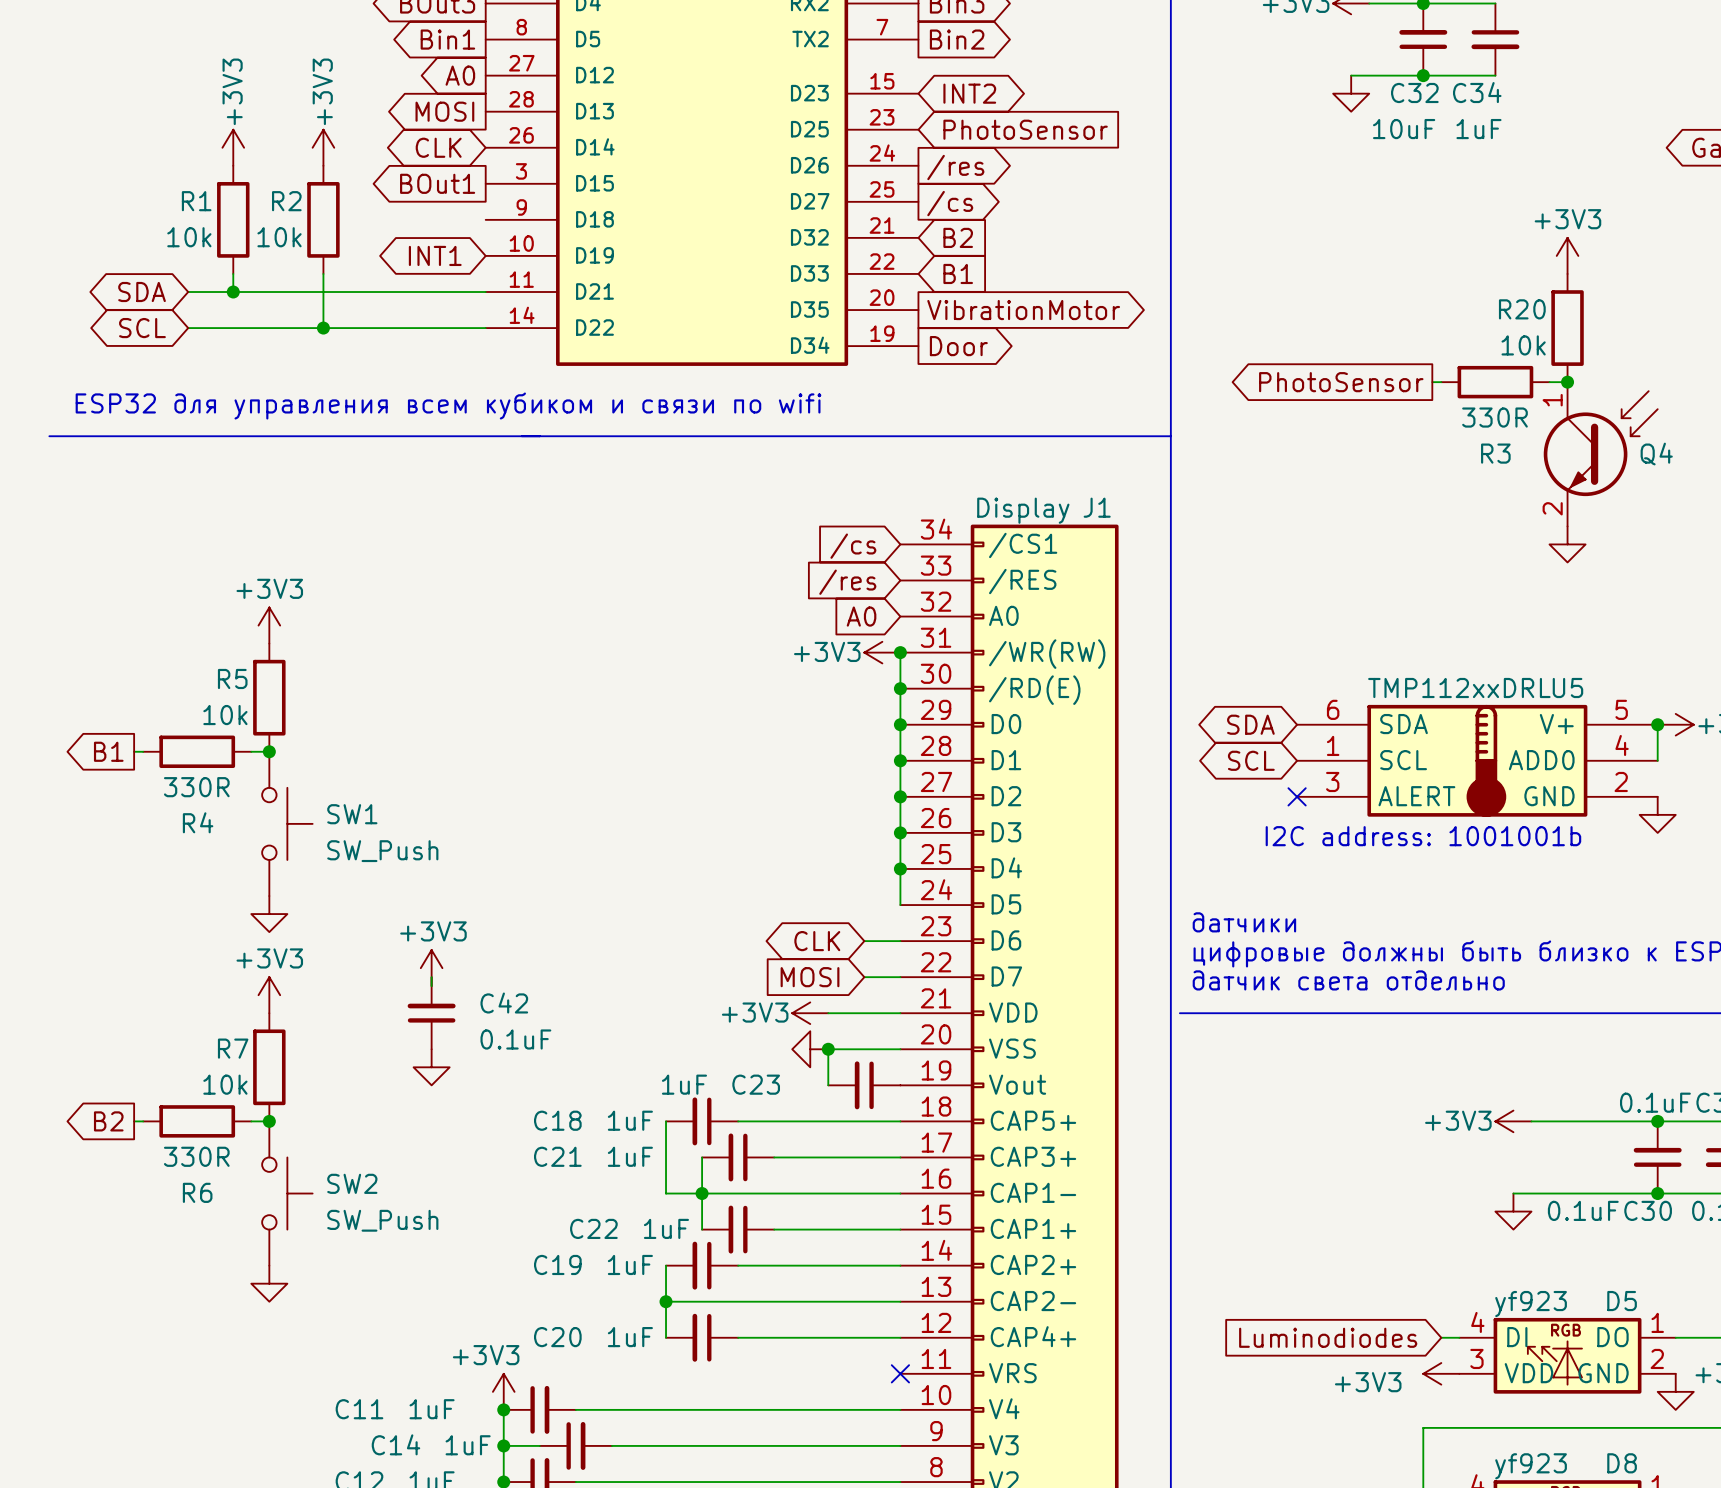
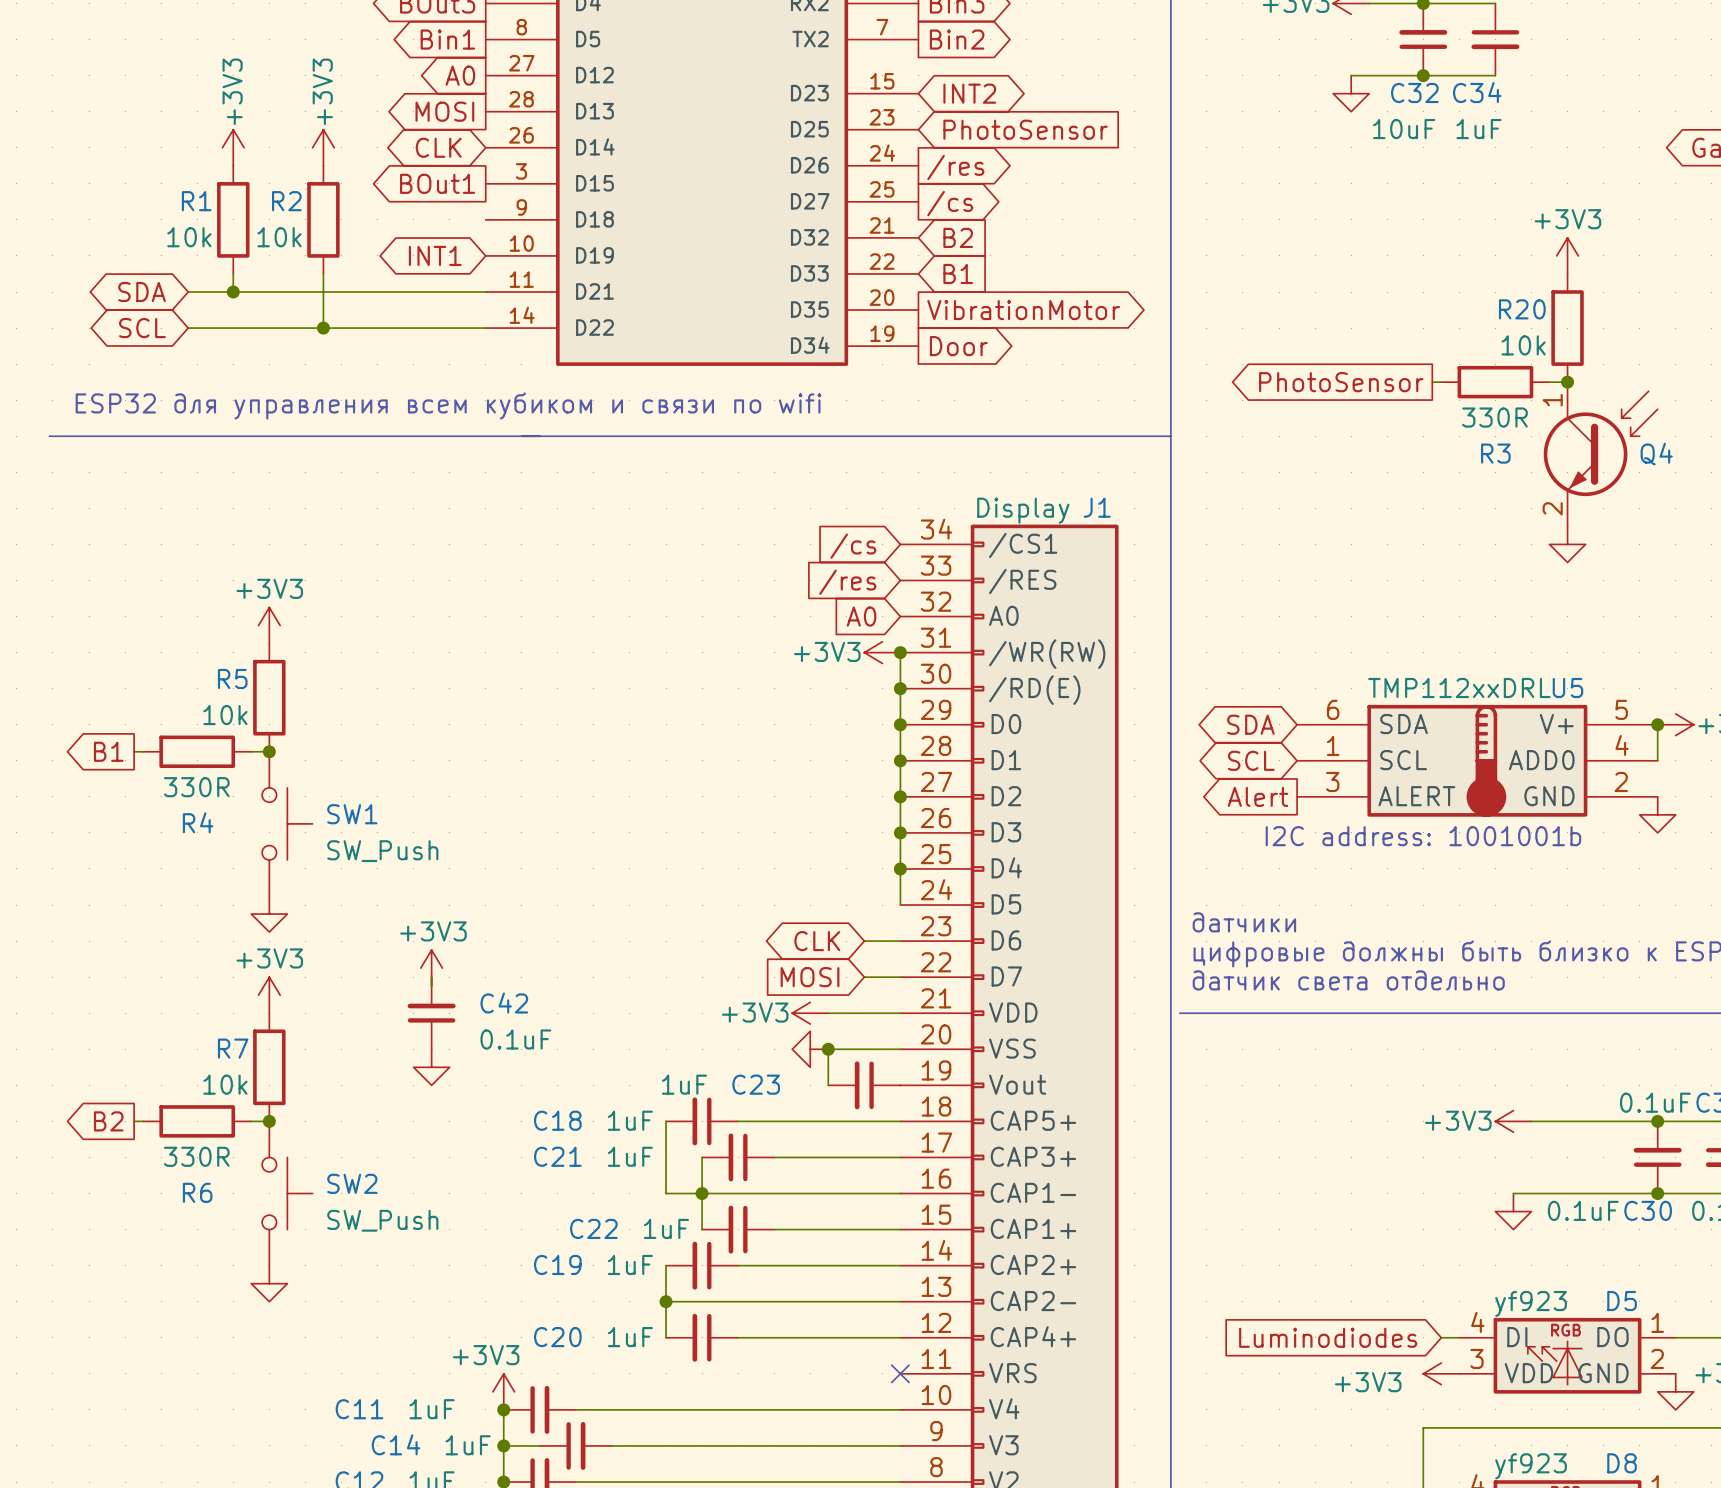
global label: none -> Alert (1257, 796)
no-connect mark: (1297, 796) -> none

